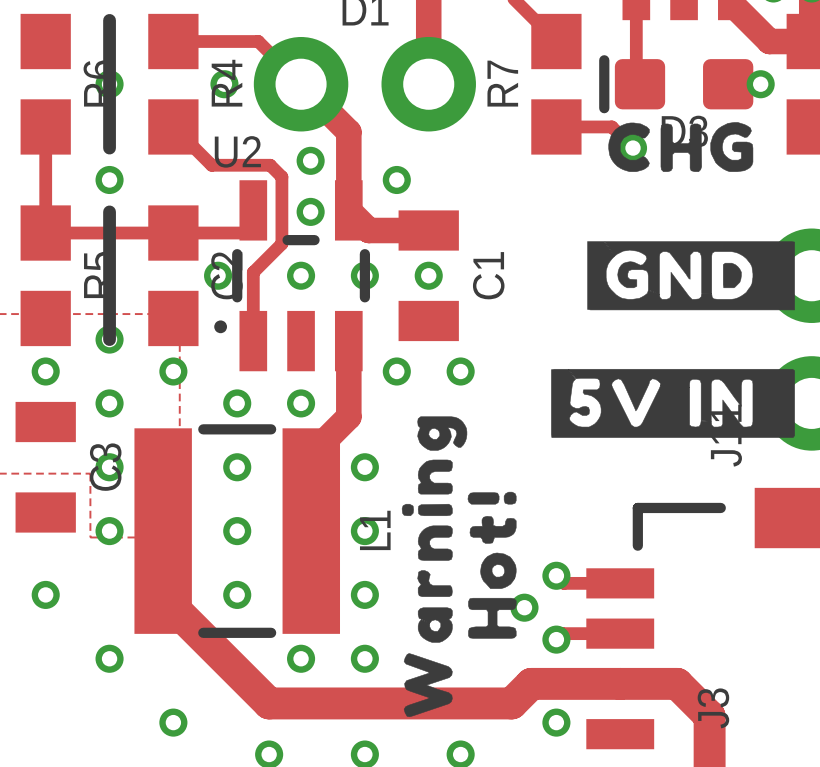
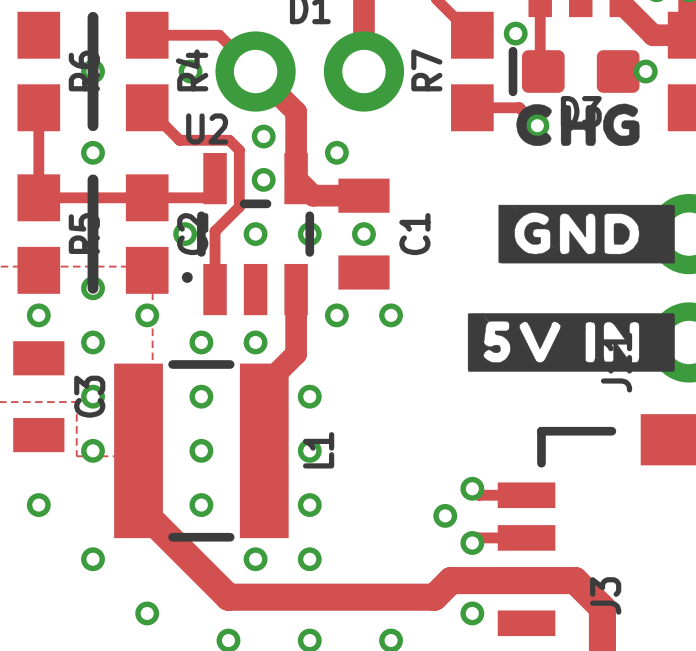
via: none -> (515, 33)
drawing: [401, 416, 517, 718] -> none

